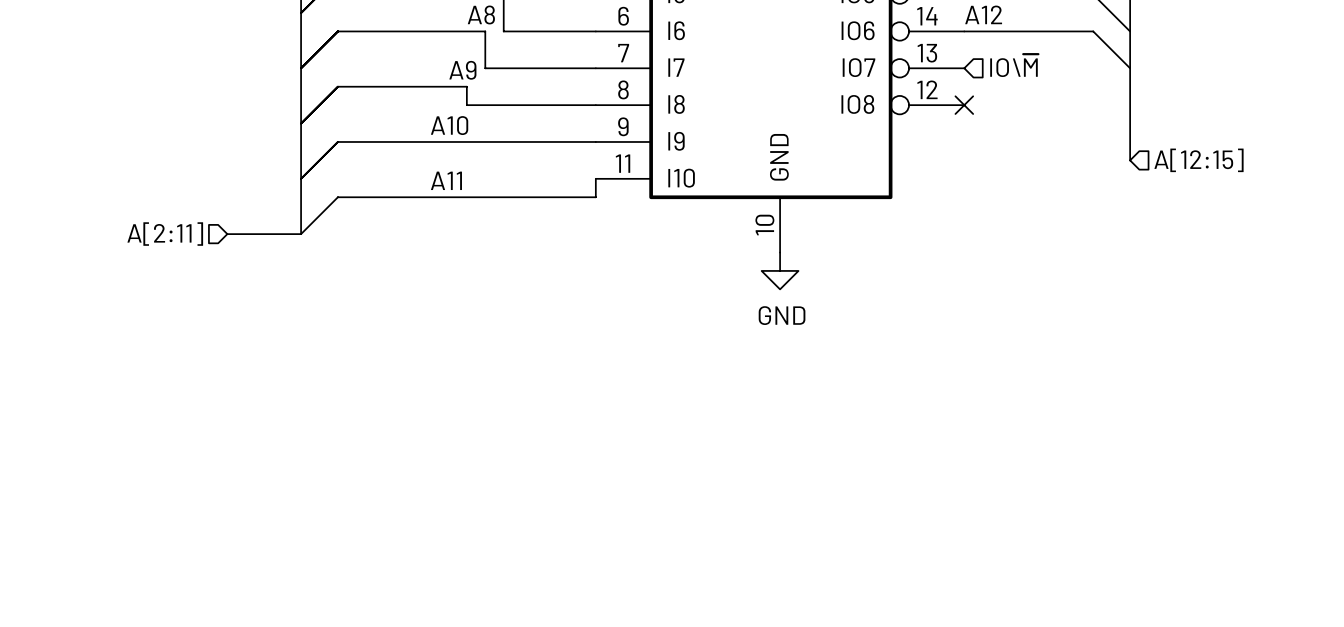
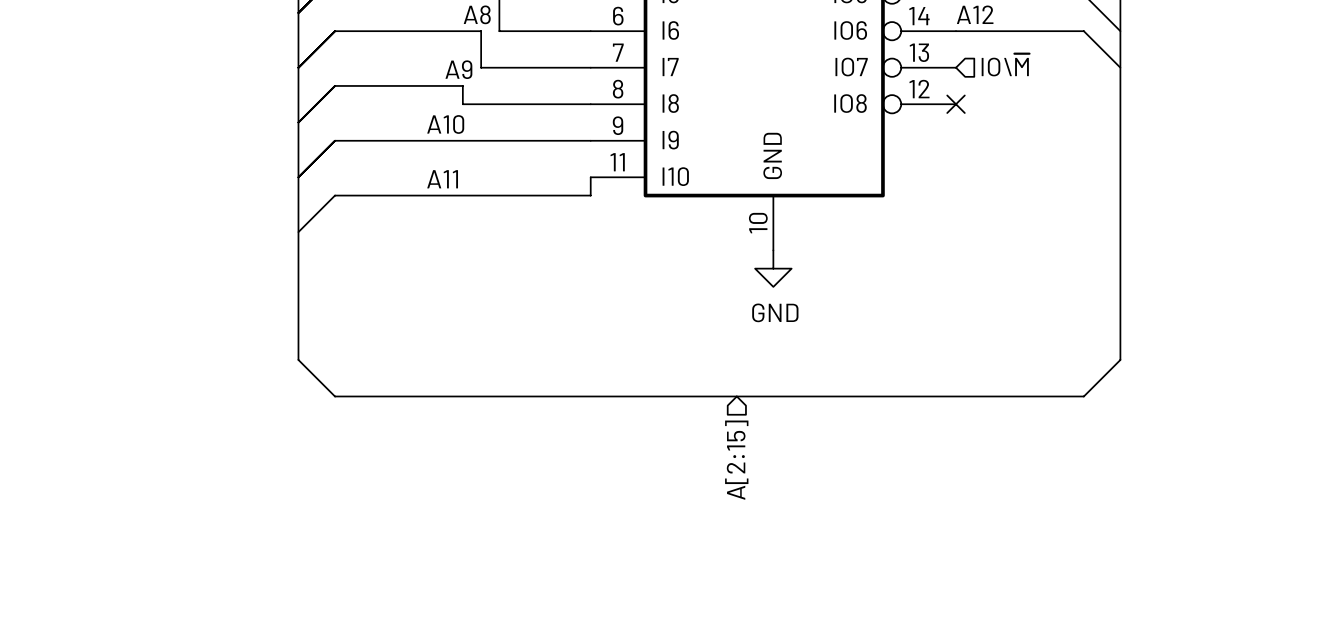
hierarchical label: A[12:15] (1198, 160) -> none
hierarchical label: A[2:11] (165, 234) -> none
bus: (227, 234) (301, 234) -> (1120, 159) (1120, 359) (1083, 396) (335, 396) (298, 359) (298, 232)
hierarchical label: none -> A[2:15] (736, 460)

